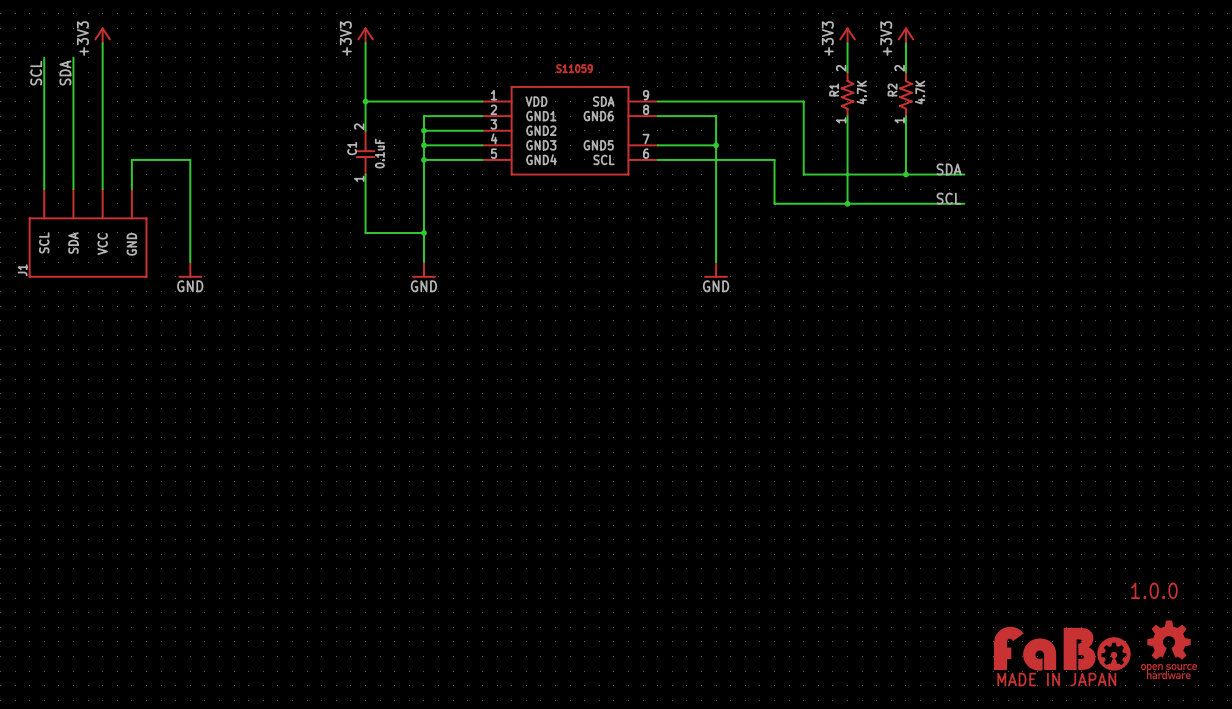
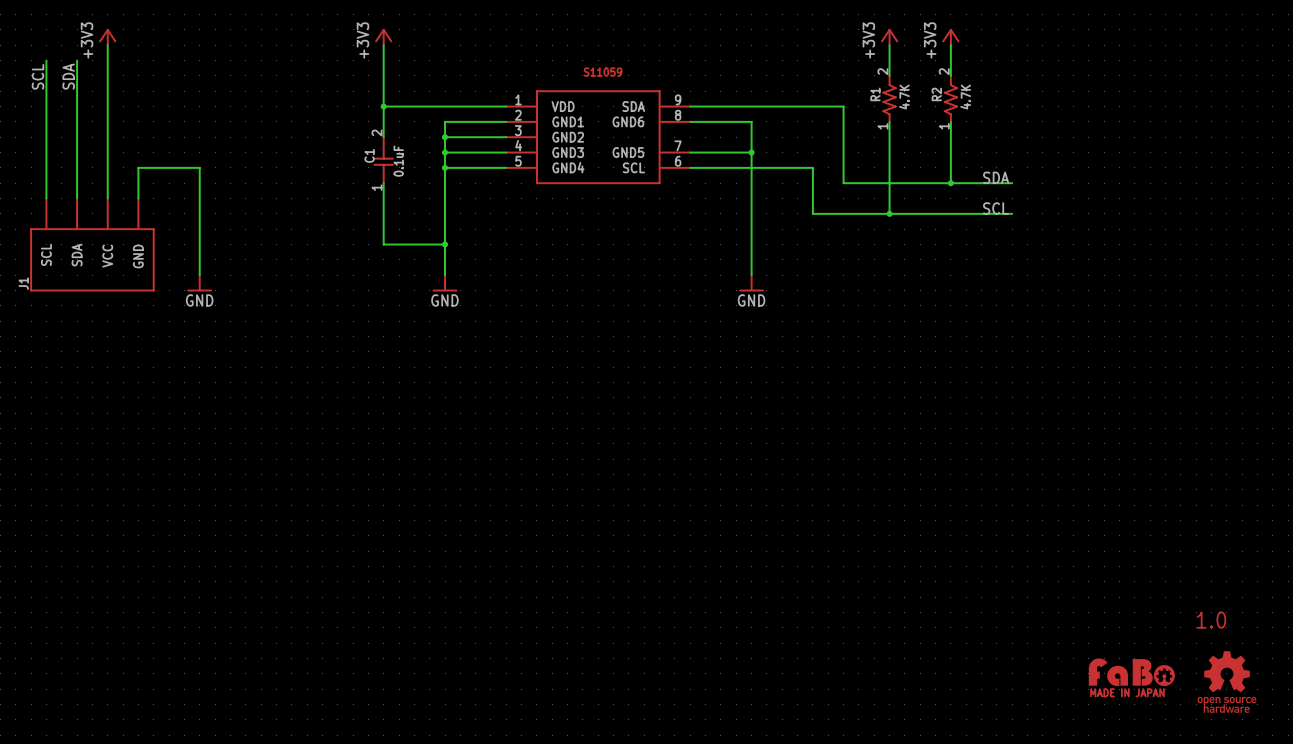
text: 1.0.0 (1154, 590) -> 1.0 (1211, 620)
part: none -> (1131, 672)
part: (1062, 648) -> none

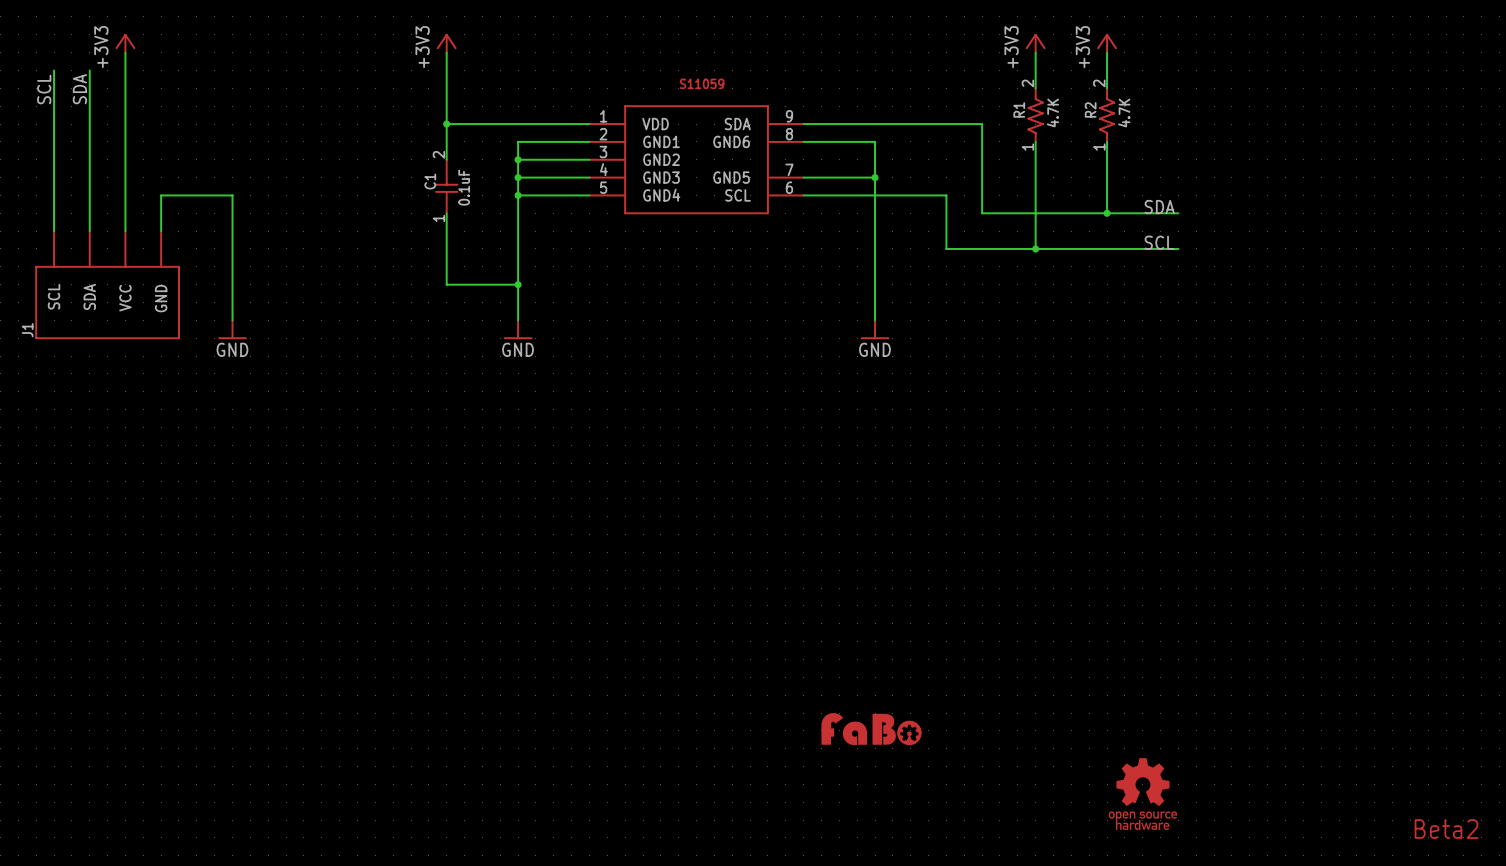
text: 1.0 (1211, 620) -> none
part: none -> (871, 729)
part: (1131, 672) -> none
part: none -> (1142, 794)
part: (1227, 682) -> none
text: none -> Beta2 (1446, 829)

